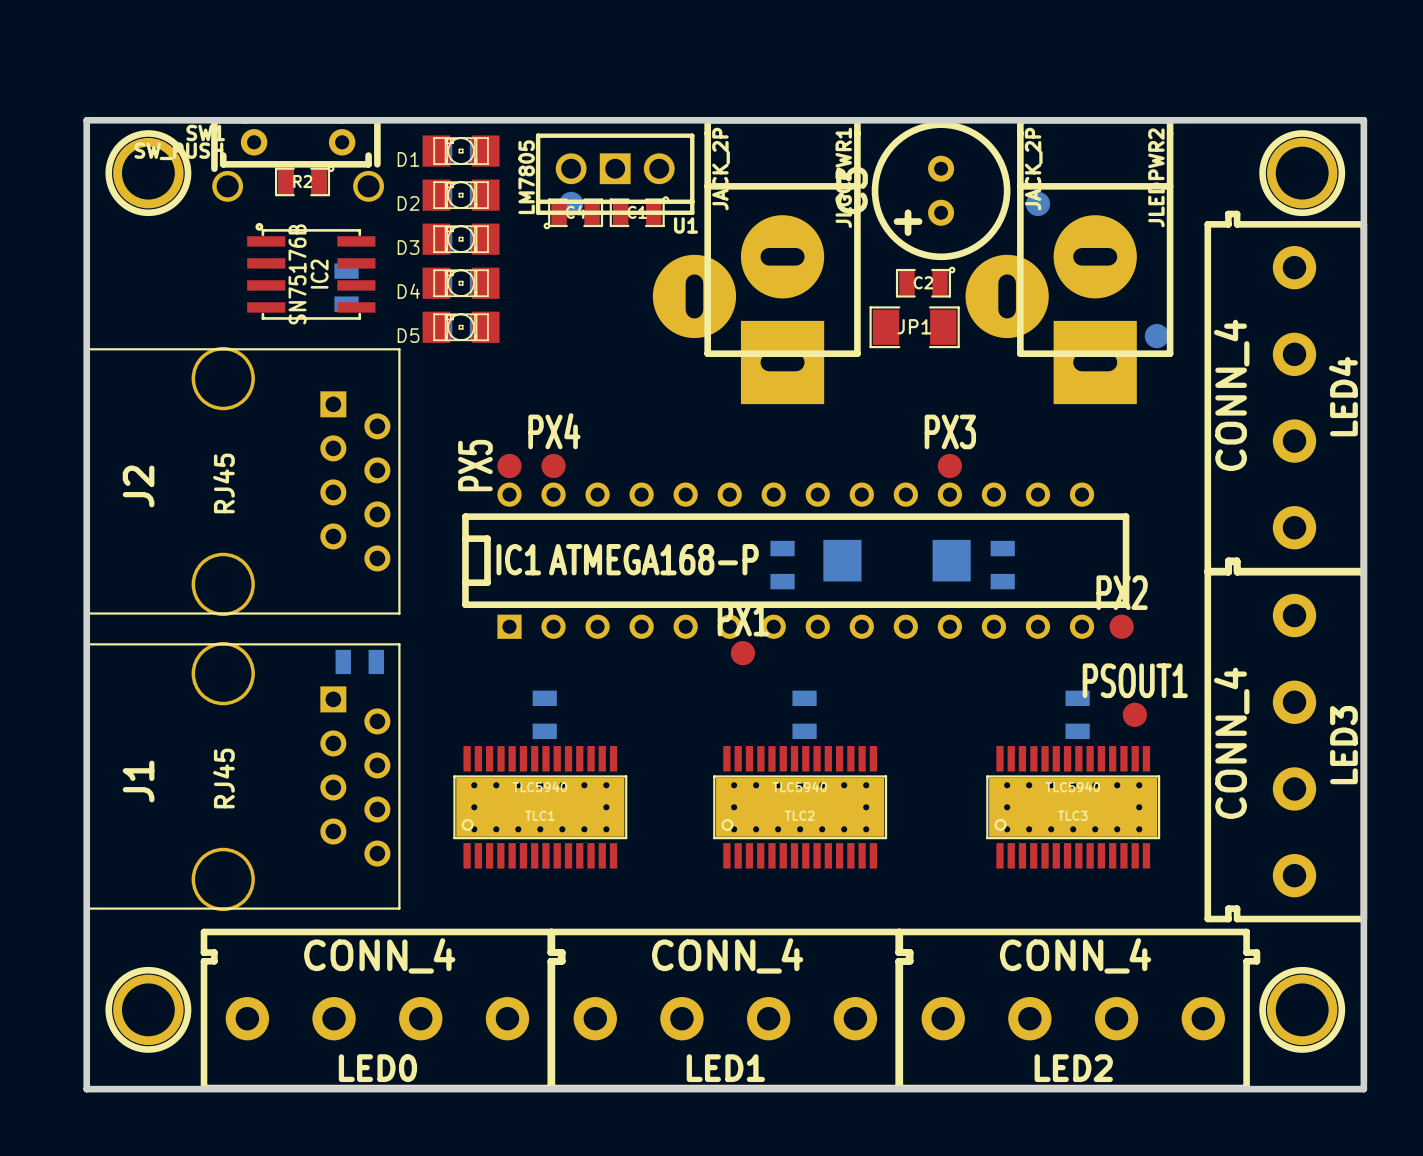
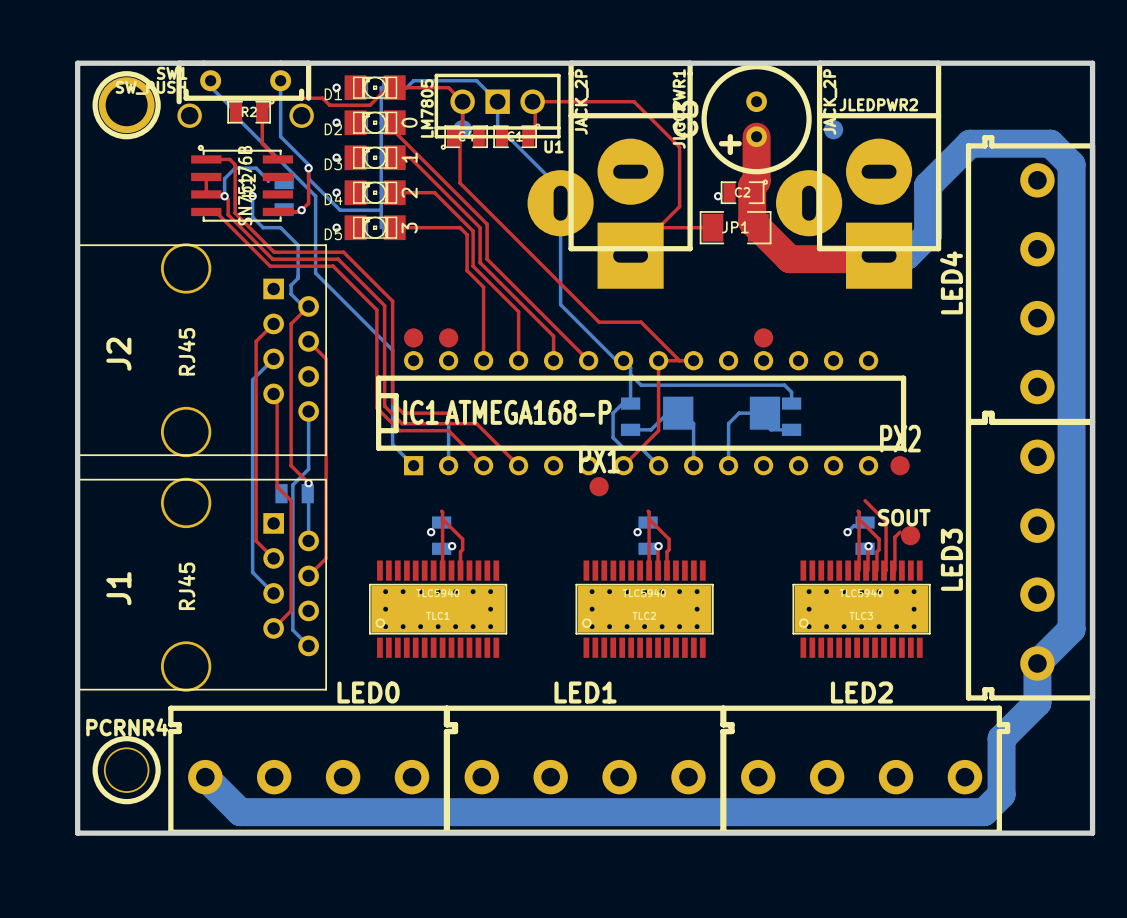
bottom track: none -> (210, 80) (210, 86) (236, 112) (236, 116) (315, 196) (315, 273) (392, 350) (392, 444) (413, 465)
bottom track: none -> (280, 80) (280, 136) (308, 164) (308, 178) (340, 210) (381, 210)
via: none -> (336, 87)
top track: none -> (403, 87) (387, 87) (370, 105) (329, 105) (322, 98) (276, 98) (262, 112) (262, 143) (277, 159)
top track: none -> (403, 87) (448, 87) (462, 101) (459, 183) (599, 322) (641, 322) (679, 360)
part: (1302, 173) -> none
JLEDPWR2 name rotation: 0° (1156, 177) -> 90° clockwise (878, 104)
via: none -> (336, 122)
top track: none -> (387, 122) (385, 122) (487, 224) (487, 259) (588, 360)
text: none -> 0 (409, 122)
top track: none -> (535, 136) (535, 104) (532, 101) (634, 101) (679, 147) (679, 206) (630, 255)
top track: none -> (756, 136) (756, 181) (752, 185) (752, 221) (789, 259) (875, 259) (879, 255)
via: none -> (336, 157)
top track: none -> (387, 157) (410, 157) (480, 227) (480, 262) (553, 336) (553, 360)
text: none -> 1 (409, 157)
top track: none -> (206, 159) (229, 159) (235, 164) (235, 213) (274, 252) (343, 252) (392, 301) (392, 402) (403, 413) (448, 413)
top track: none -> (308, 168) (308, 203) (299, 211) (277, 211)
via: none -> (308, 168)
top track: none -> (206, 176) (206, 194) (222, 194) (228, 199) (228, 214) (272, 259) (338, 259) (384, 305) (384, 406) (402, 423) (476, 423) (518, 465)
bottom track: none -> (268, 181) (256, 168) (235, 168) (224, 178) (224, 196)
IC2 position: (311, 271) -> (242, 183)
via: none -> (336, 192)
top track: none -> (387, 192) (434, 192) (473, 231) (473, 266) (518, 311) (518, 360)
text: none -> 2 (409, 193)
via: none -> (224, 196)
bottom track: none -> (252, 196) (252, 217) (263, 227) (280, 227) (298, 245) (298, 278) (291, 285) (291, 294) (303, 306) (308, 306)
via: none -> (252, 196)
via: none -> (718, 196)
via: none -> (301, 210)
top track: none -> (206, 211) (215, 211) (270, 266) (333, 266) (376, 309) (376, 407) (399, 430) (448, 430) (483, 465)
via: none -> (336, 227)
bottom track: none -> (381, 227) (381, 87) (406, 87) (413, 80) (476, 80) (497, 101) (497, 126) (560, 189) (560, 304) (616, 360) (623, 360) (630, 367) (630, 403) (622, 403) (613, 413) (613, 437) (623, 448) (641, 448) (658, 465)
top track: none -> (387, 227) (460, 227) (467, 234) (467, 270) (483, 287) (483, 360)
text: none -> 3 (409, 228)
top track: none -> (658, 227) (712, 227)
bottom track: none -> (879, 255) (907, 255) (928, 234) (928, 185) (970, 143) (1050, 143) (1071, 164) (1071, 629) (1037, 663) (1037, 702) (1001, 738) (1001, 794) (984, 812) (240, 812) (205, 777)
LED4 value: CONN_4 (1231, 395) -> none
LED4 name position: LED4 (1343, 396) -> LED4 (951, 282)
top track: none -> (308, 306) (291, 323) (291, 465) (308, 483)
PX4 name: PX4 (554, 431) -> none
PX3 name: PX3 (950, 431) -> none
top track: none -> (273, 323) (256, 341) (256, 540) (273, 558)
PX5 name: PX5 (475, 465) -> none
top track: none -> (308, 341) (326, 358) (326, 558) (308, 575)
bottom track: none -> (273, 358) (252, 379) (252, 572) (273, 593)
top track: none -> (693, 360) (658, 360) (658, 430) (623, 465)
bottom track: none -> (630, 374) (641, 385) (784, 385) (791, 392) (791, 403)
top track: none -> (273, 393) (277, 397) (277, 486) (291, 500) (291, 610) (273, 628)
bottom track: none -> (308, 411) (308, 469) (292, 484) (292, 630) (308, 645)
bottom track: none -> (448, 413) (448, 465)
part position: (1002, 565) -> (791, 416)
bottom track: none -> (630, 429) (651, 429) (667, 413) (683, 413) (693, 423) (693, 465)
bottom track: none -> (791, 429) (771, 429) (754, 413) (739, 413) (728, 423) (728, 465)
bottom track: none -> (308, 483) (308, 540)
via: none -> (308, 483)
top track: none -> (865, 500) (886, 521) (886, 570)
PSOUT1 name: PSOUT1 (1135, 680) -> none
top track: none -> (441, 511) (442, 570)
top track: none -> (648, 511) (649, 570)
top track: none -> (858, 511) (859, 570)
text: none -> SOUT (904, 517)
top track: none -> (442, 519) (462, 539) (460, 570)
top track: none -> (649, 519) (669, 539) (666, 570)
top track: none -> (859, 519) (879, 539) (876, 570)
bottom track: none -> (858, 526) (853, 526) (847, 532)
via: none -> (431, 532)
via: none -> (637, 532)
via: none -> (847, 532)
top track: none -> (900, 532) (894, 537) (894, 570)
via: none -> (452, 546)
top track: none -> (658, 546) (658, 570)
via: none -> (658, 546)
top track: none -> (868, 546) (868, 570)
via: none -> (868, 546)
LED3 value: CONN_4 (1231, 743) -> none
LED3 name position: LED3 (1343, 745) -> LED3 (951, 559)
LED0 value: CONN_4 (379, 955) -> none
LED1 value: CONN_4 (727, 955) -> none
LED2 value: CONN_4 (1075, 955) -> none
part: (148, 1009) -> none
PCRNR4: none -> (126, 770)
part: (1302, 1009) -> none
LED0 name position: LED0 (377, 1068) -> LED0 (368, 692)
LED1 name position: LED1 (725, 1068) -> LED1 (585, 692)
LED2 name position: LED2 (1073, 1068) -> LED2 (862, 692)

